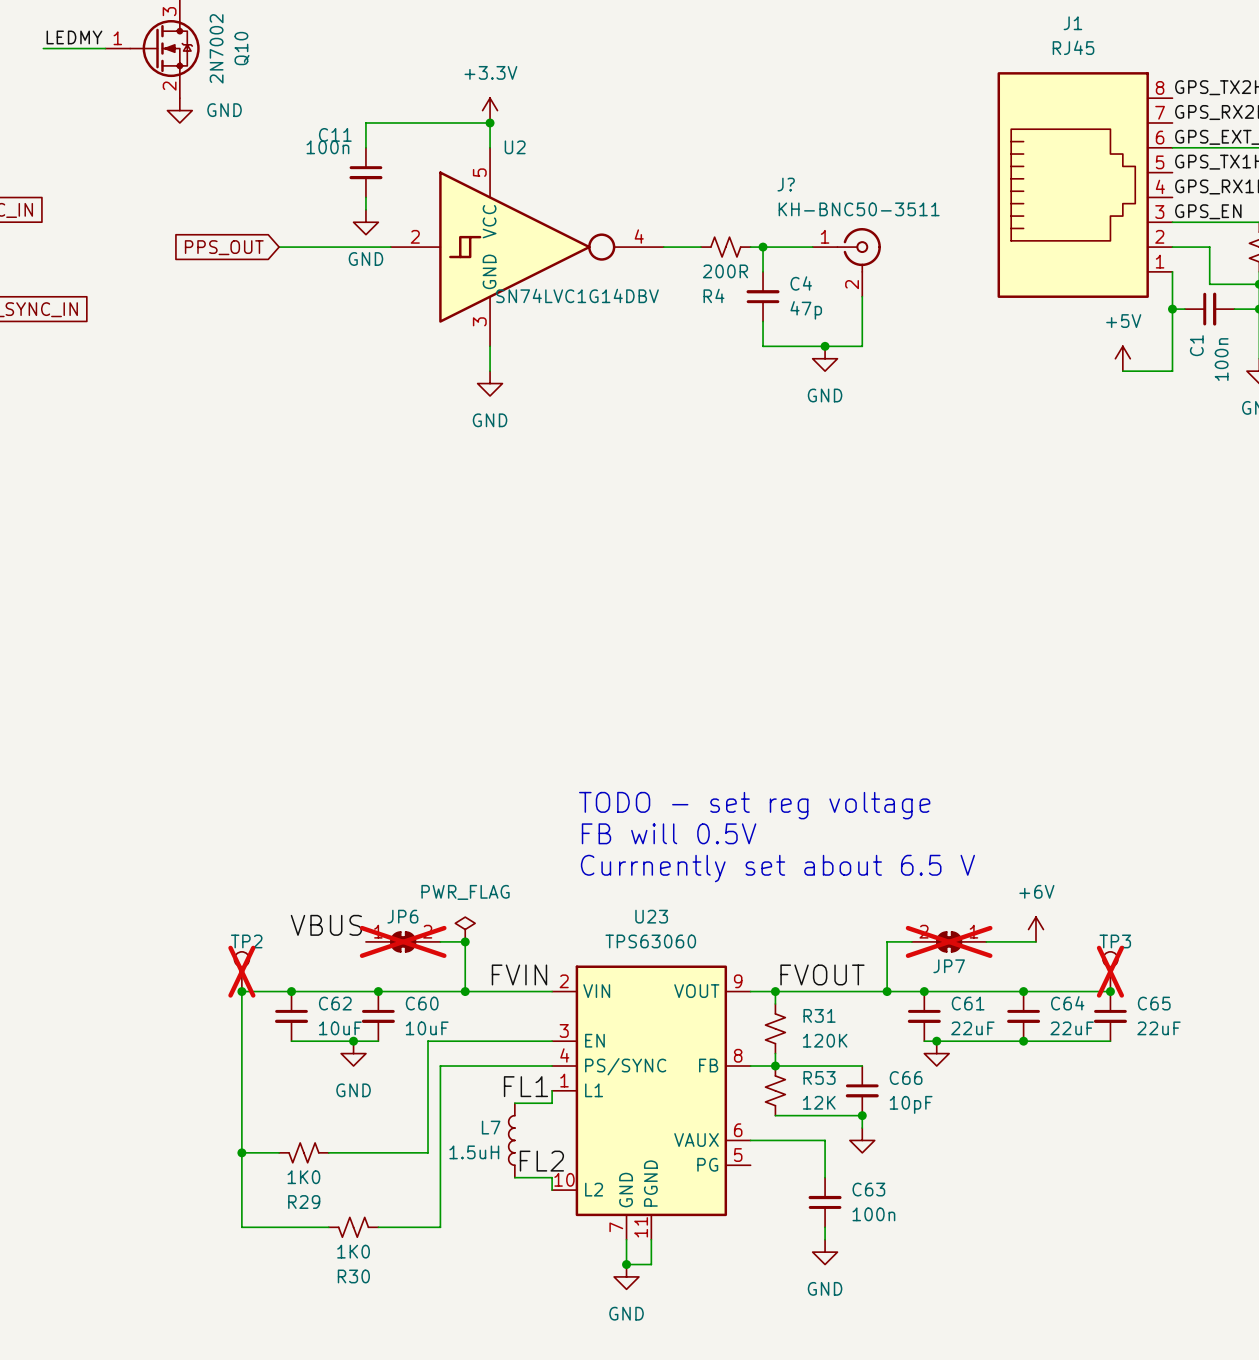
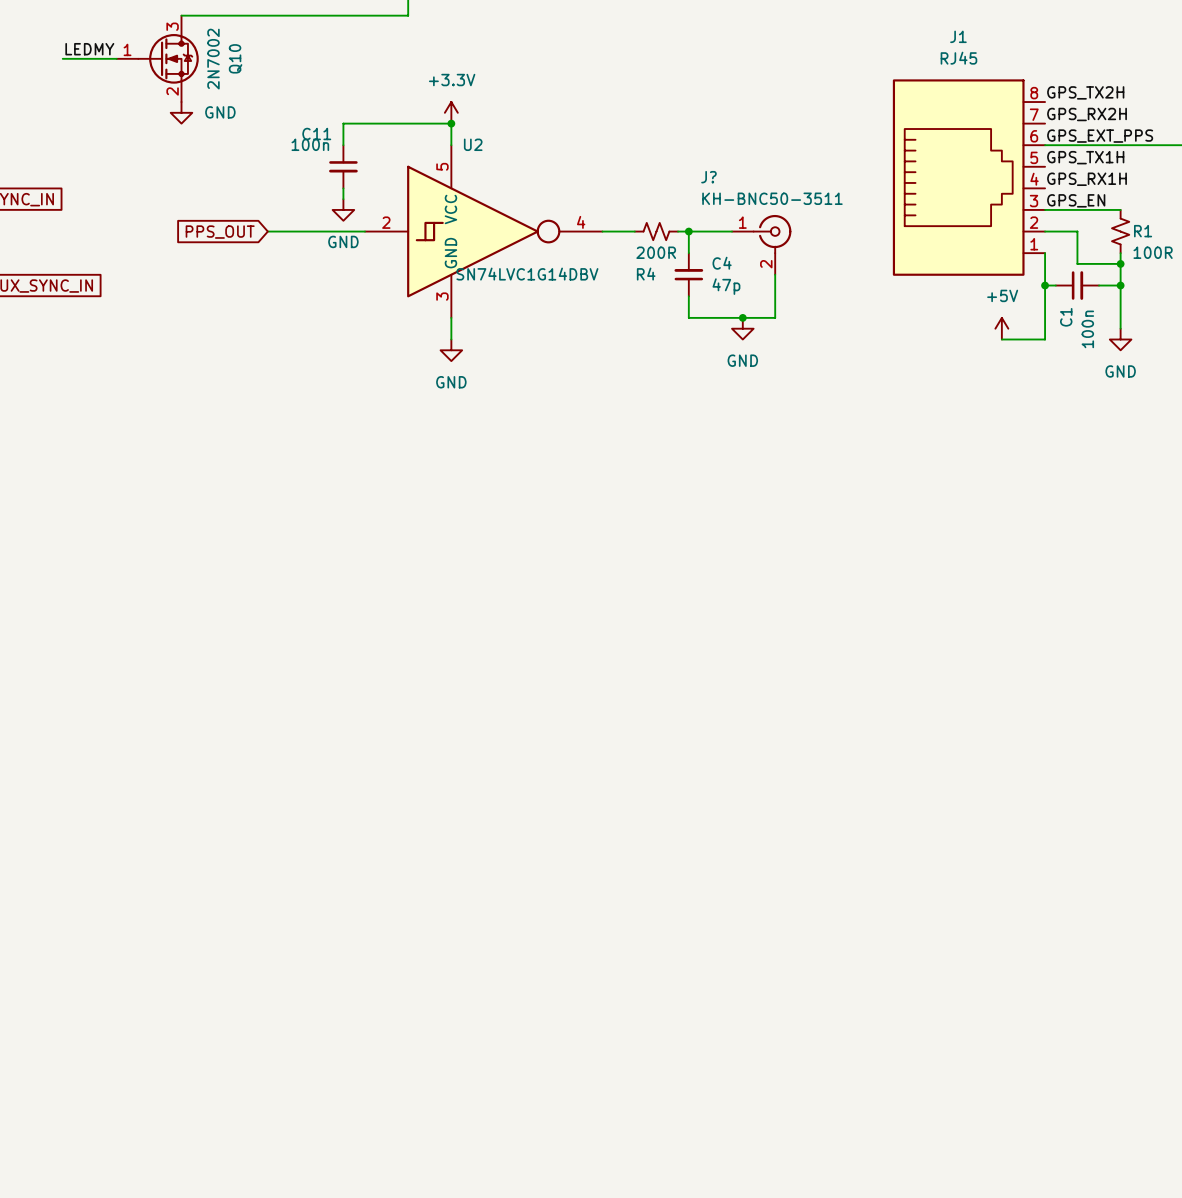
text: TODO - set reg voltage (754, 805) -> none
text: FB will 0.5V (669, 833) -> none
text: Currnently set about 6.5 V (777, 868) -> none
label: VBUS (326, 925) -> none
power symbol: PWR_FLAG (465, 929) -> none
power symbol: +6V (1035, 929) -> none
JP6: (403, 941) -> none
wire: (440, 941) (465, 941) (465, 991) -> none
junction: (465, 941) -> none
wire: (911, 941) (887, 941) (887, 991) -> none
JP7: (949, 941) -> none
wire: (986, 941) (1035, 941) -> none
TP2: (241, 971) -> none
TP3: (1110, 971) -> none
label: FVIN (519, 974) -> none
label: FVOUT (822, 974) -> none
junction: (241, 991) -> none
junction: (291, 991) -> none
junction: (378, 991) -> none
junction: (465, 991) -> none
wire: (552, 991) (241, 991) (241, 1227) (328, 1227) -> none
wire: (750, 991) (1110, 991) -> none
wire: (775, 991) (775, 1003) -> none
junction: (775, 991) -> none
junction: (887, 991) -> none
junction: (924, 991) -> none
junction: (1023, 991) -> none
junction: (1110, 991) -> none
C62: 10uF (291, 1016) -> none
C60: 10uF (378, 1016) -> none
C61: 22uF (924, 1016) -> none
C64: 22uF (1023, 1016) -> none
C65: 22uF (1110, 1016) -> none
R31: 120K (775, 1028) -> none
wire: (291, 1041) (378, 1041) -> none
junction: (353, 1041) -> none
wire: (552, 1041) (428, 1041) (428, 1152) (328, 1152) -> none
wire: (924, 1041) (1110, 1041) -> none
junction: (936, 1041) -> none
junction: (1023, 1041) -> none
power symbol: GND (353, 1053) -> none
wire: (775, 1053) (775, 1066) -> none
power symbol: (936, 1053) -> none
wire: (552, 1066) (440, 1066) (440, 1227) (378, 1227) -> none
wire: (750, 1066) (862, 1066) -> none
junction: (775, 1066) -> none
label: FL1 (525, 1086) -> none
wire: (552, 1090) (552, 1103) (514, 1103) -> none
R53: 12K (775, 1090) -> none
C66: 10pF (862, 1090) -> none
U23: TPS63060 (651, 1102) -> none
wire: (775, 1115) (862, 1115) (862, 1128) -> none
junction: (862, 1115) -> none
L7: 1.5uH (511, 1140) -> none
wire: (750, 1140) (825, 1140) (825, 1177) -> none
power symbol: (862, 1140) -> none
wire: (241, 1152) (279, 1152) -> none
junction: (241, 1152) -> none
R29: 1K0 (303, 1152) -> none
label: FL2 (541, 1161) -> none
wire: (514, 1177) (552, 1177) (552, 1190) -> none
C63: 100n (825, 1202) -> none
R30: 1K0 (353, 1227) -> none
wire: (825, 1227) (825, 1239) -> none
wire: (626, 1239) (626, 1264) (651, 1264) (651, 1239) -> none
power symbol: GND (825, 1252) -> none
junction: (626, 1264) -> none
power symbol: GND (626, 1276) -> none

